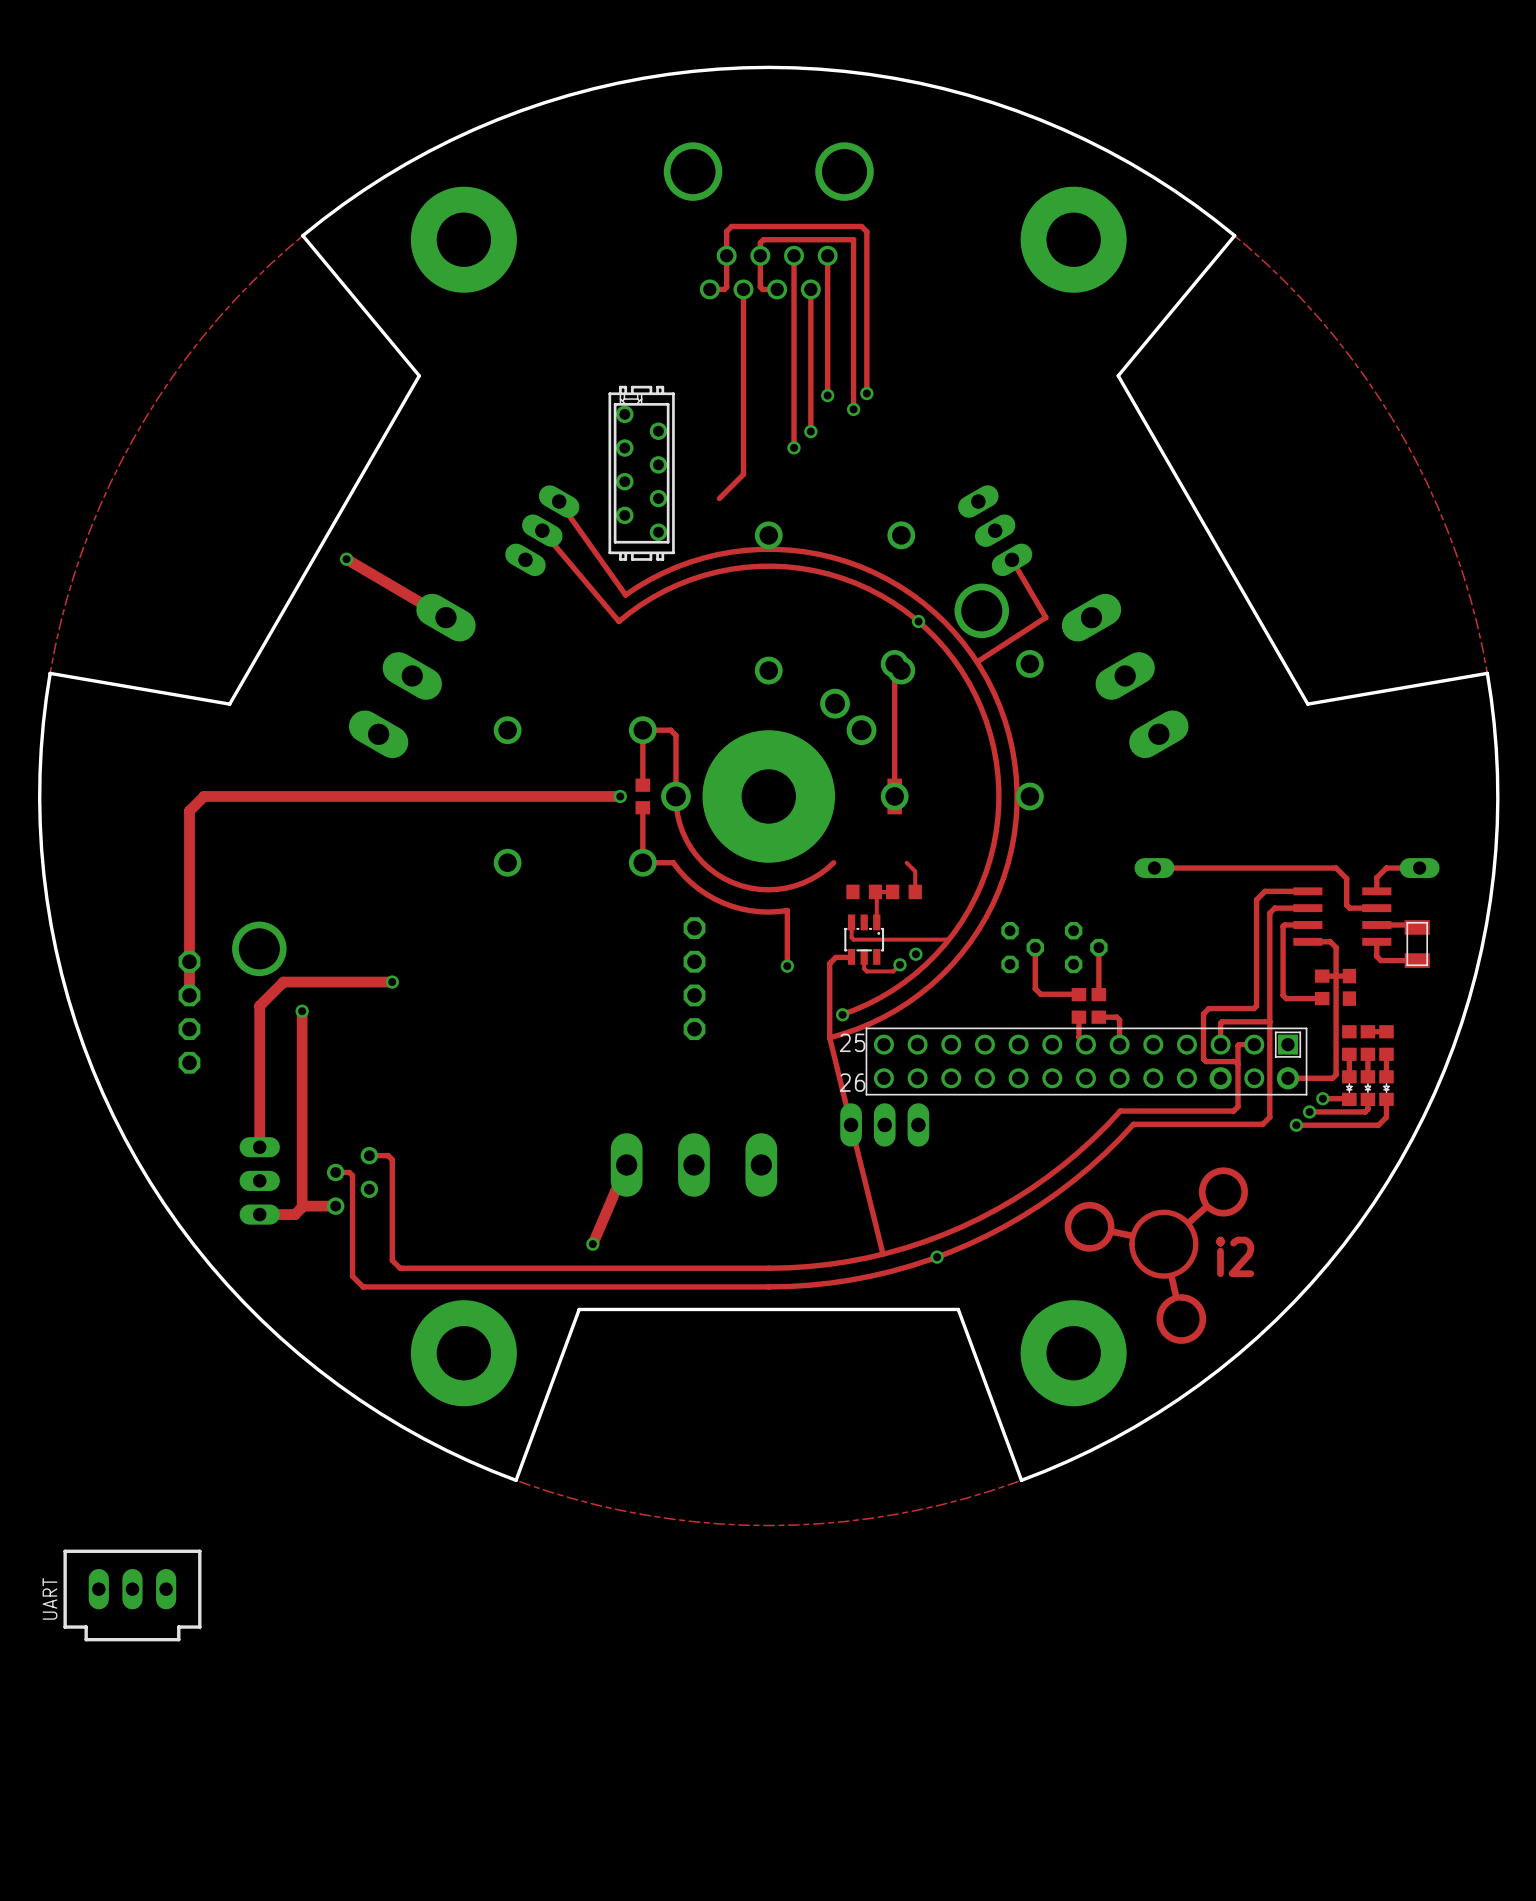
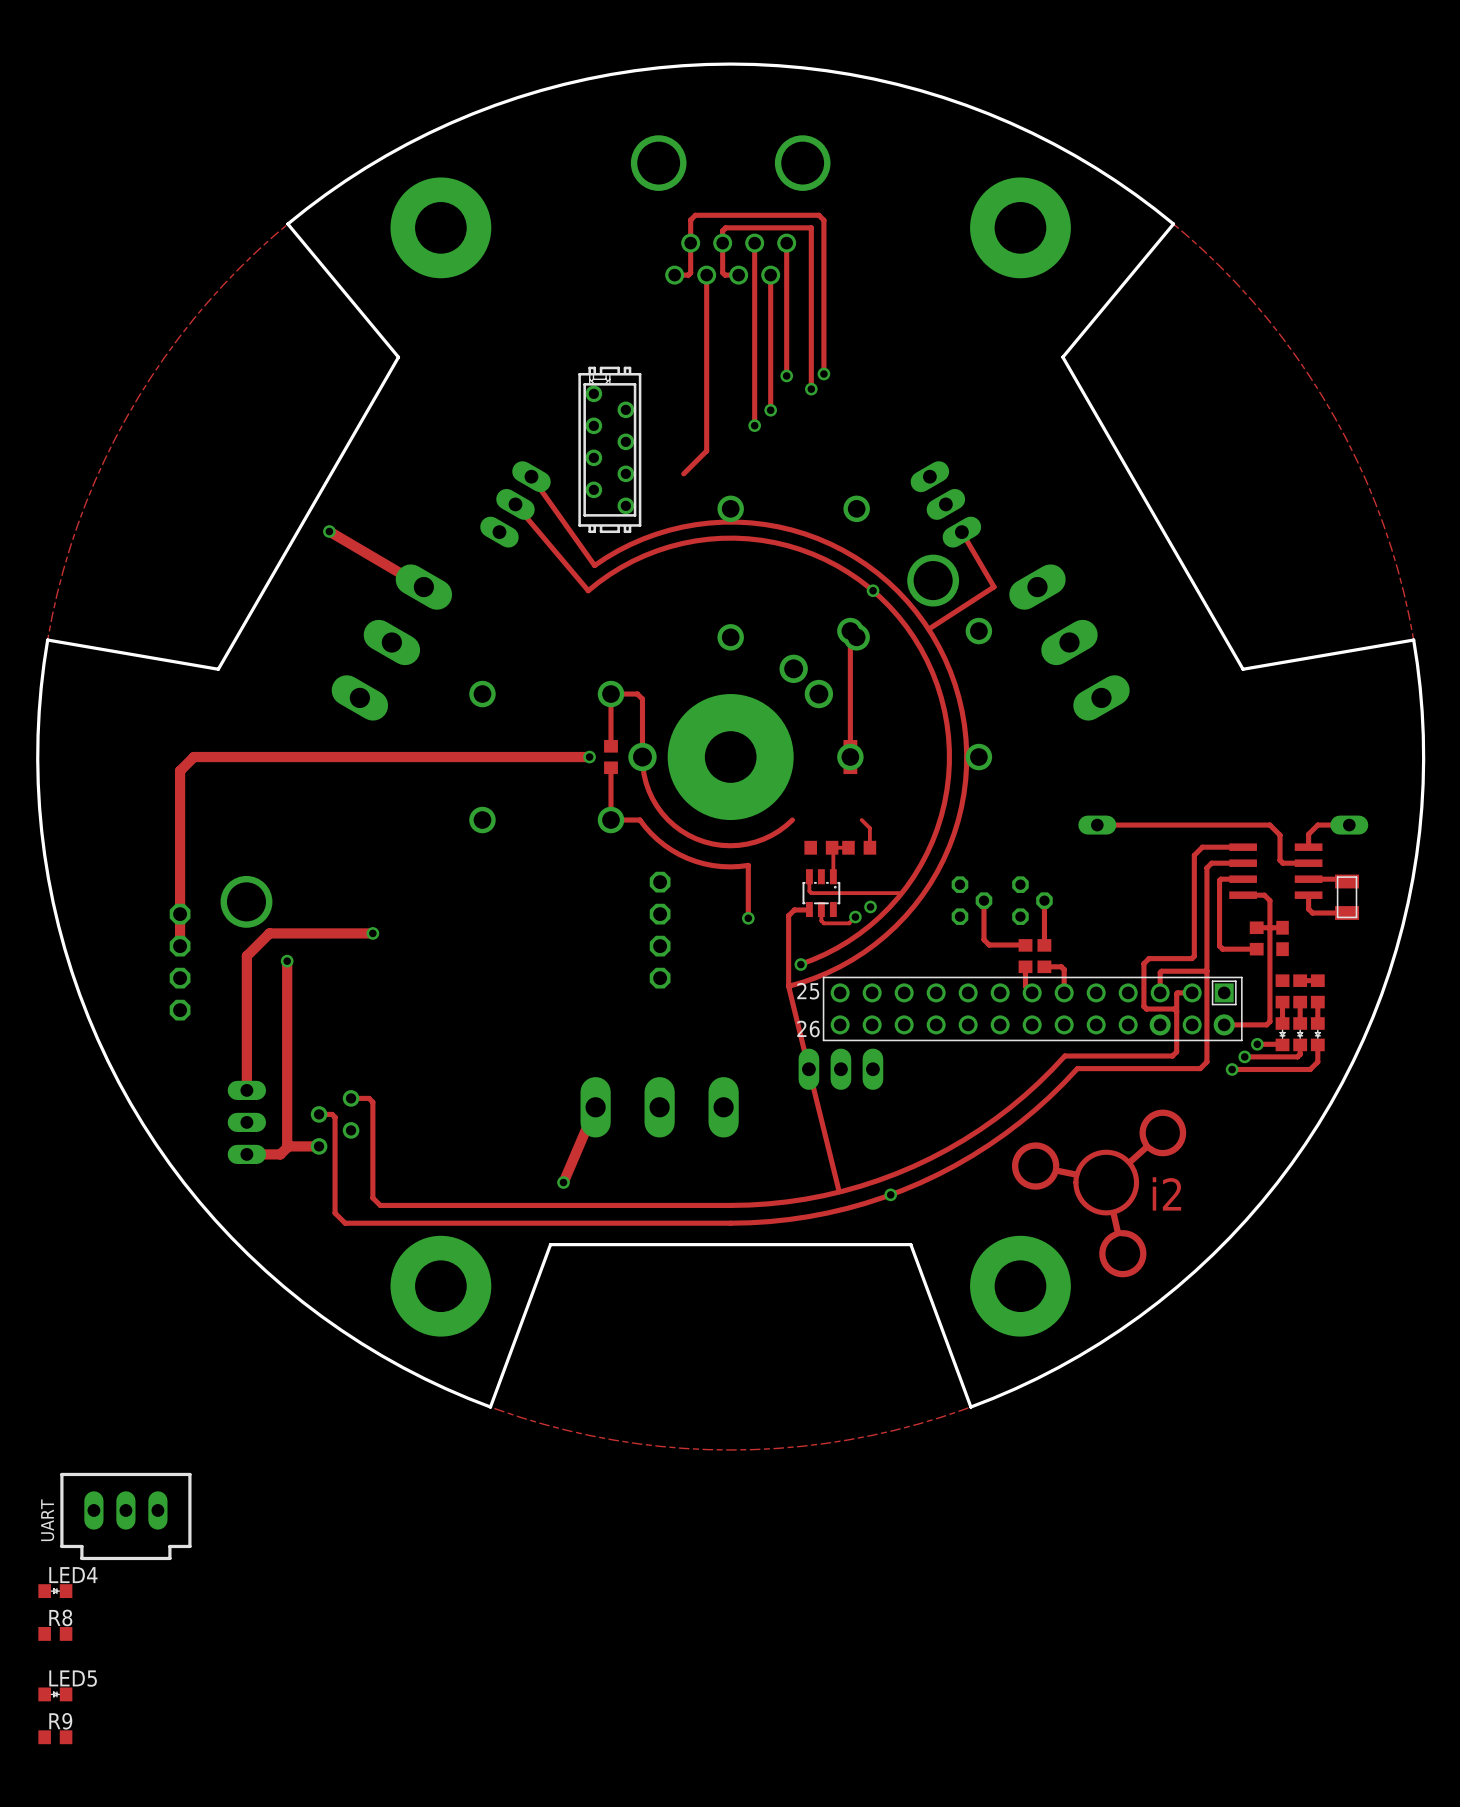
LED4: none -> (55, 1591)
R8: none -> (55, 1633)
LED5: none -> (55, 1694)
R9: none -> (55, 1737)

